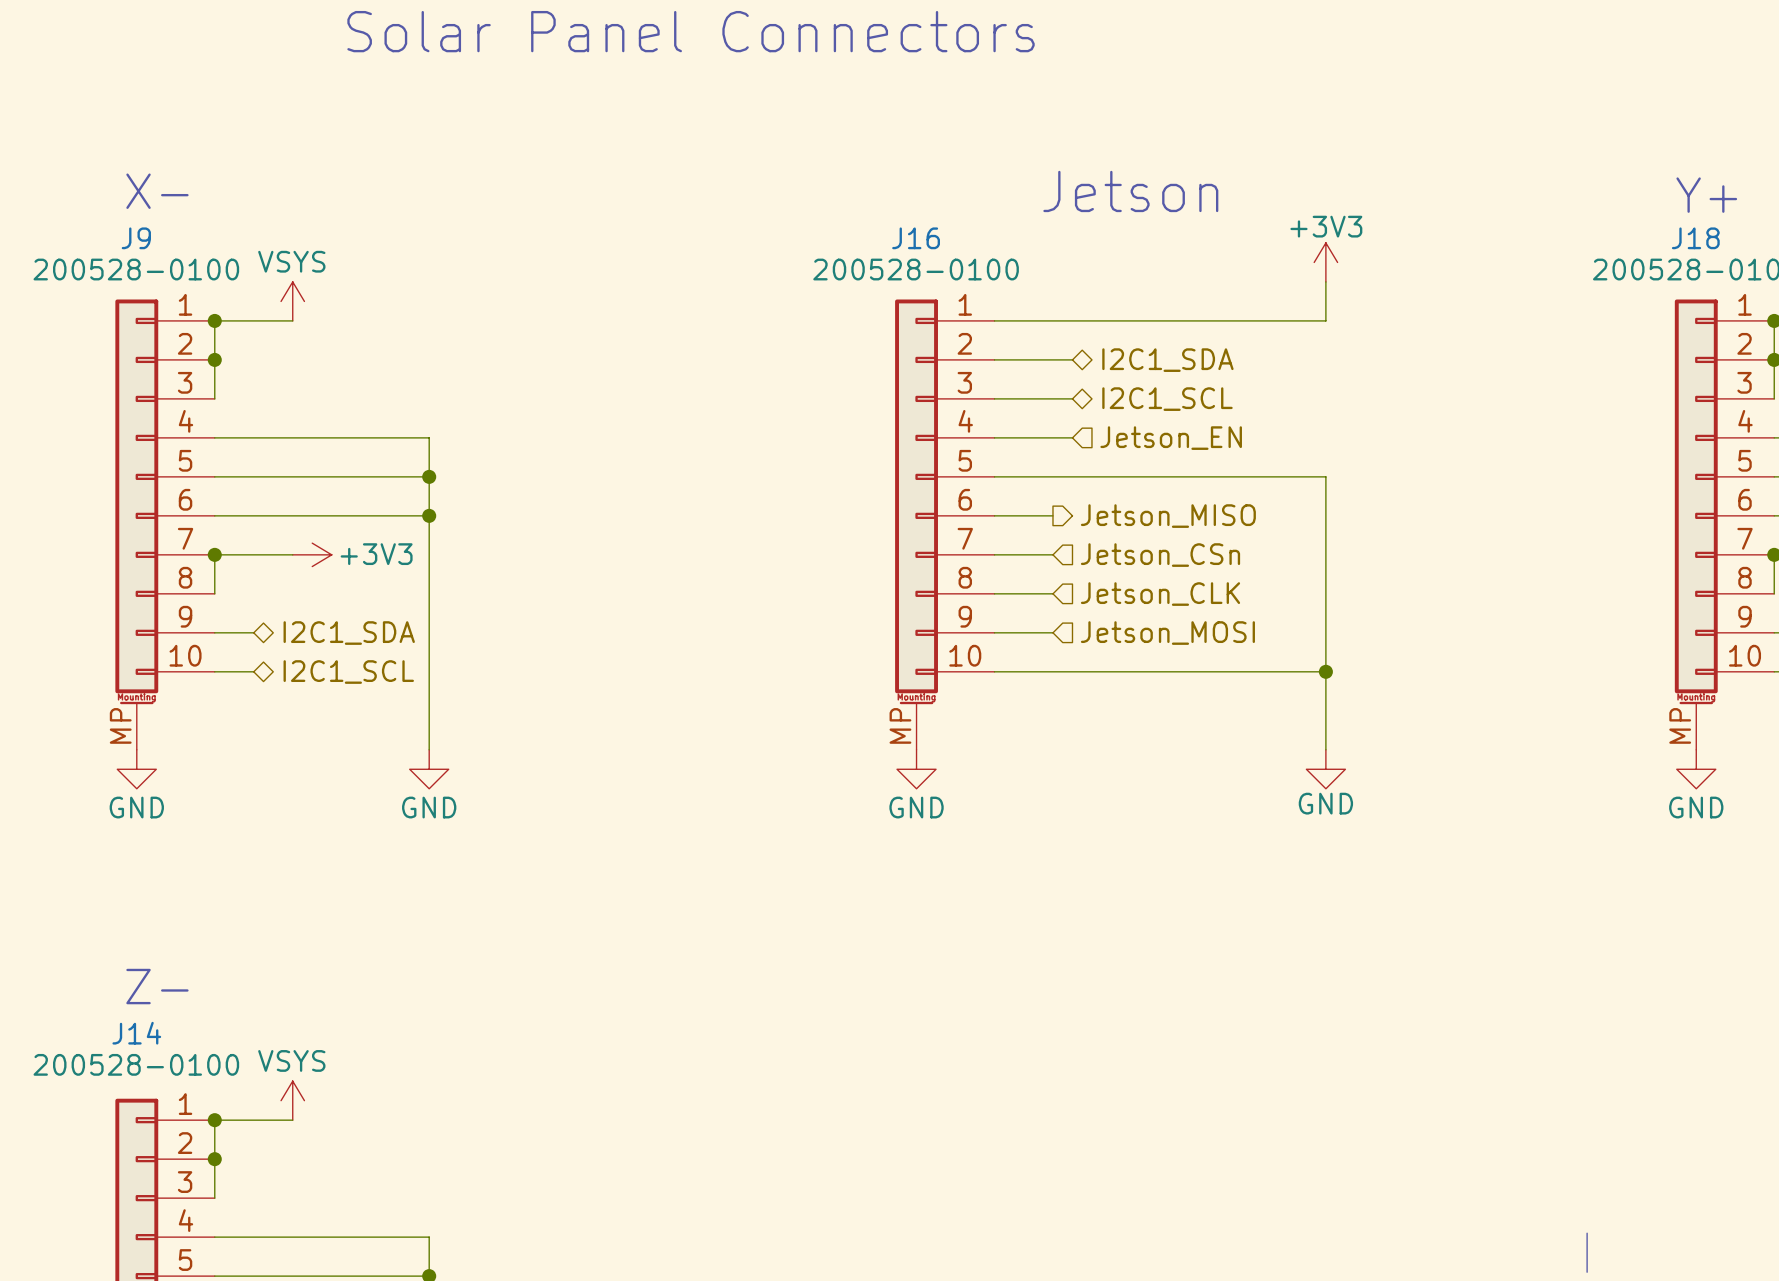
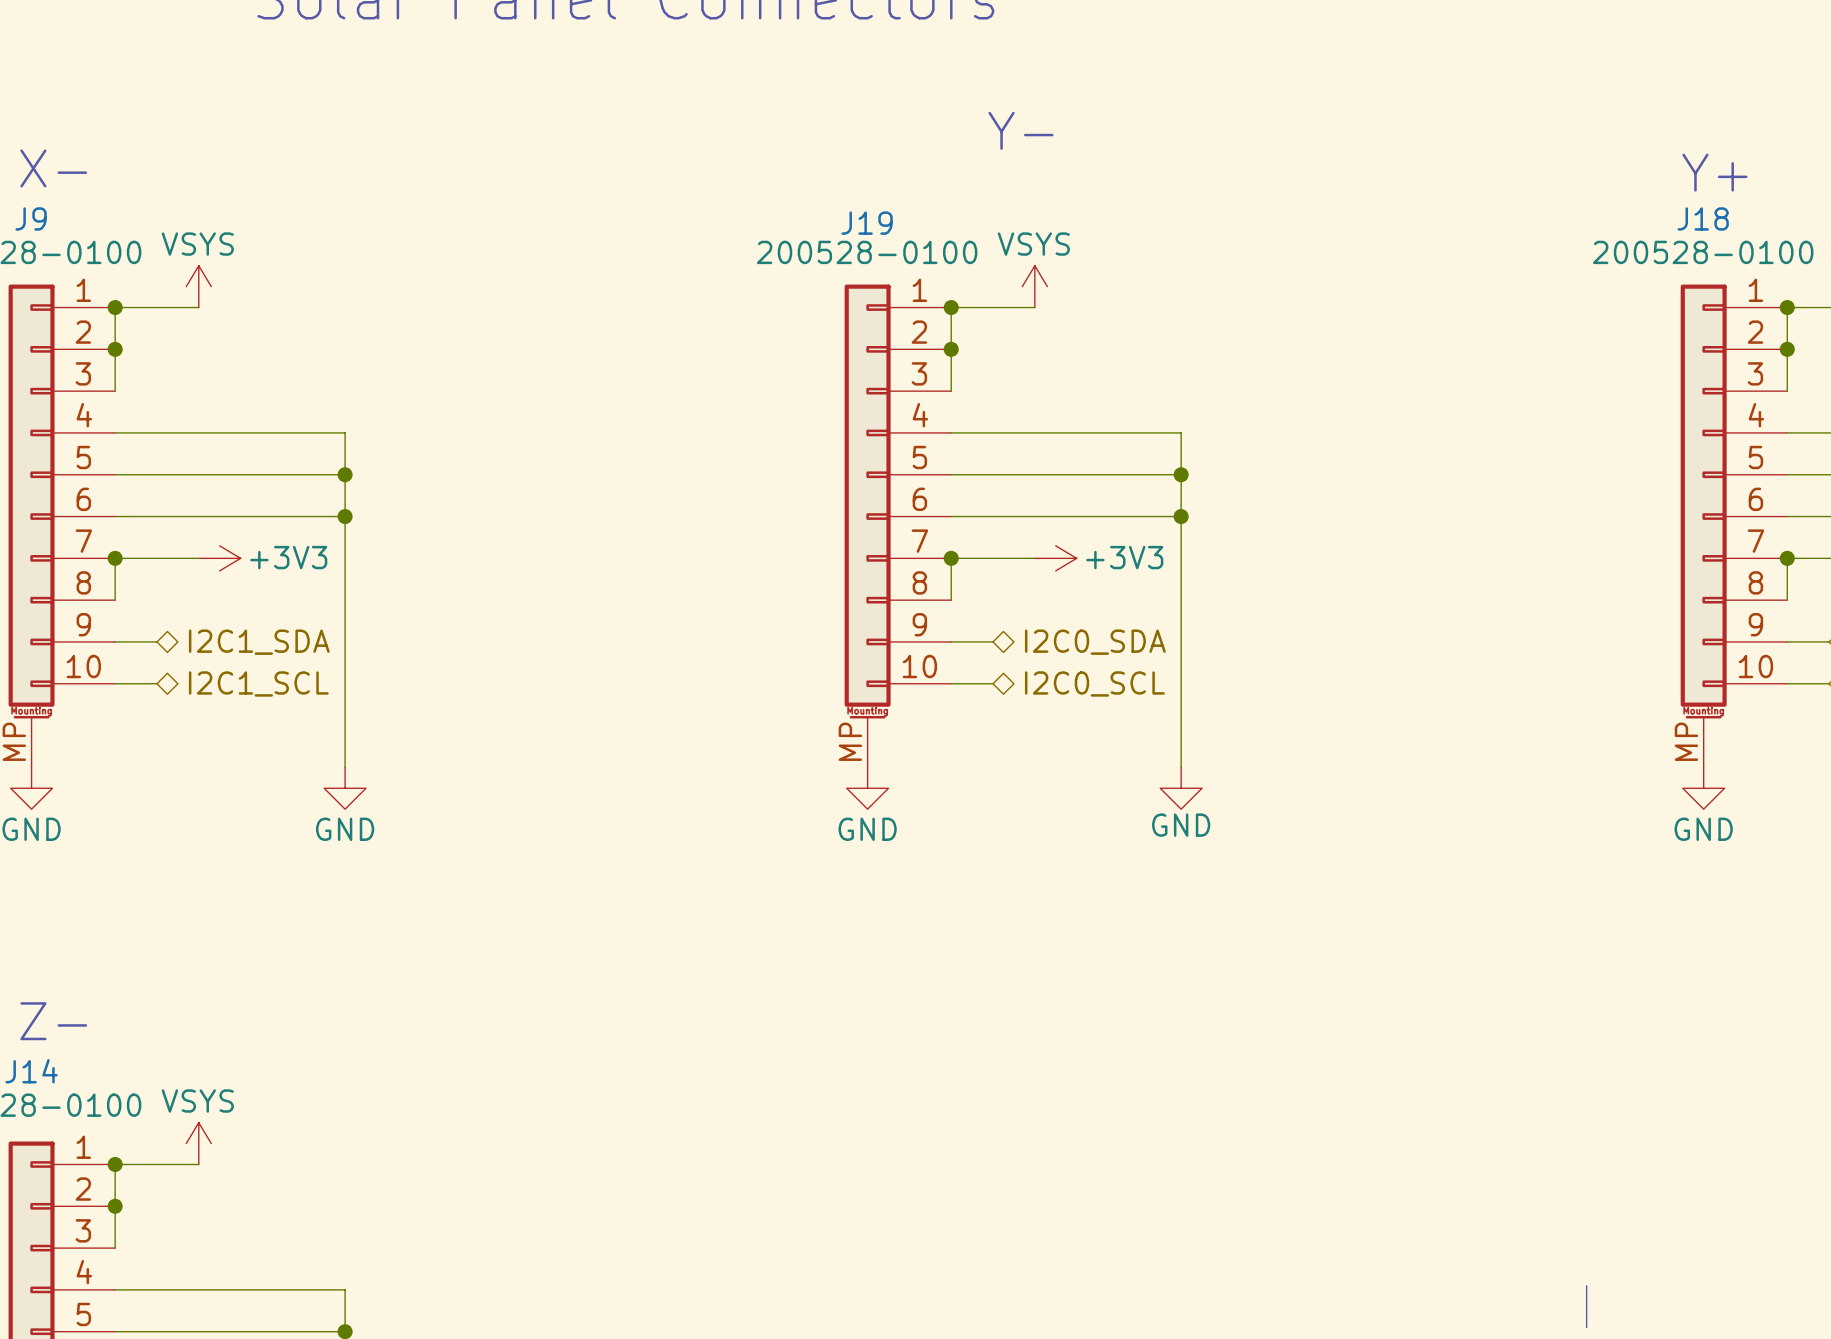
text: none -> Y- (1021, 130)
text: Jetson (1130, 191) -> none
power symbol text position: +3V3 (1326, 226) -> +3V3 (1124, 557)
J16 name: J16 (916, 238) -> J19 (867, 223)
power symbol rotation: 0° (1325, 262) -> 90° clockwise (1055, 558)
power symbol position: +3V3 (1325, 262) -> +3V3 (1055, 558)
wire: (1325, 281) (1325, 320) (1072, 320) -> none
power symbol: none -> VSYS (1034, 286)
junction: none -> (951, 307)
wire: (994, 359) (1072, 359) -> none
junction: none -> (951, 349)
hierarchical label: I2C1_SDA (1167, 360) -> none
wire: (994, 398) (1072, 398) -> (951, 391) (951, 307)
hierarchical label: I2C1_SCL (1167, 399) -> none
wire: none -> (1034, 432) (1181, 432) (1181, 767)
hierarchical label: Jetson_EN (1171, 438) -> none
wire: (1208, 476) (1325, 476) (1325, 749) -> none
junction: none -> (1181, 474)
wire: none -> (1013, 516) (1181, 516)
junction: none -> (1181, 516)
hierarchical label: Jetson_MISO (1168, 516) -> none
junction: none -> (951, 558)
hierarchical label: Jetson_CSn (1160, 555) -> none
wire: (994, 593) (1052, 593) -> (951, 600) (951, 558)
hierarchical label: Jetson_CLK (1160, 594) -> none
wire: (1033, 632) (1052, 632) -> (1013, 558) (1034, 558)
hierarchical label: none -> I2C0_SDA (1095, 642)
hierarchical label: Jetson_MOSI (1167, 633) -> none
wire: (1033, 671) (1325, 671) -> none
junction: (1325, 671) -> none
hierarchical label: none -> I2C0_SCL (1094, 683)
power symbol position: GND (1325, 769) -> GND (1181, 788)

